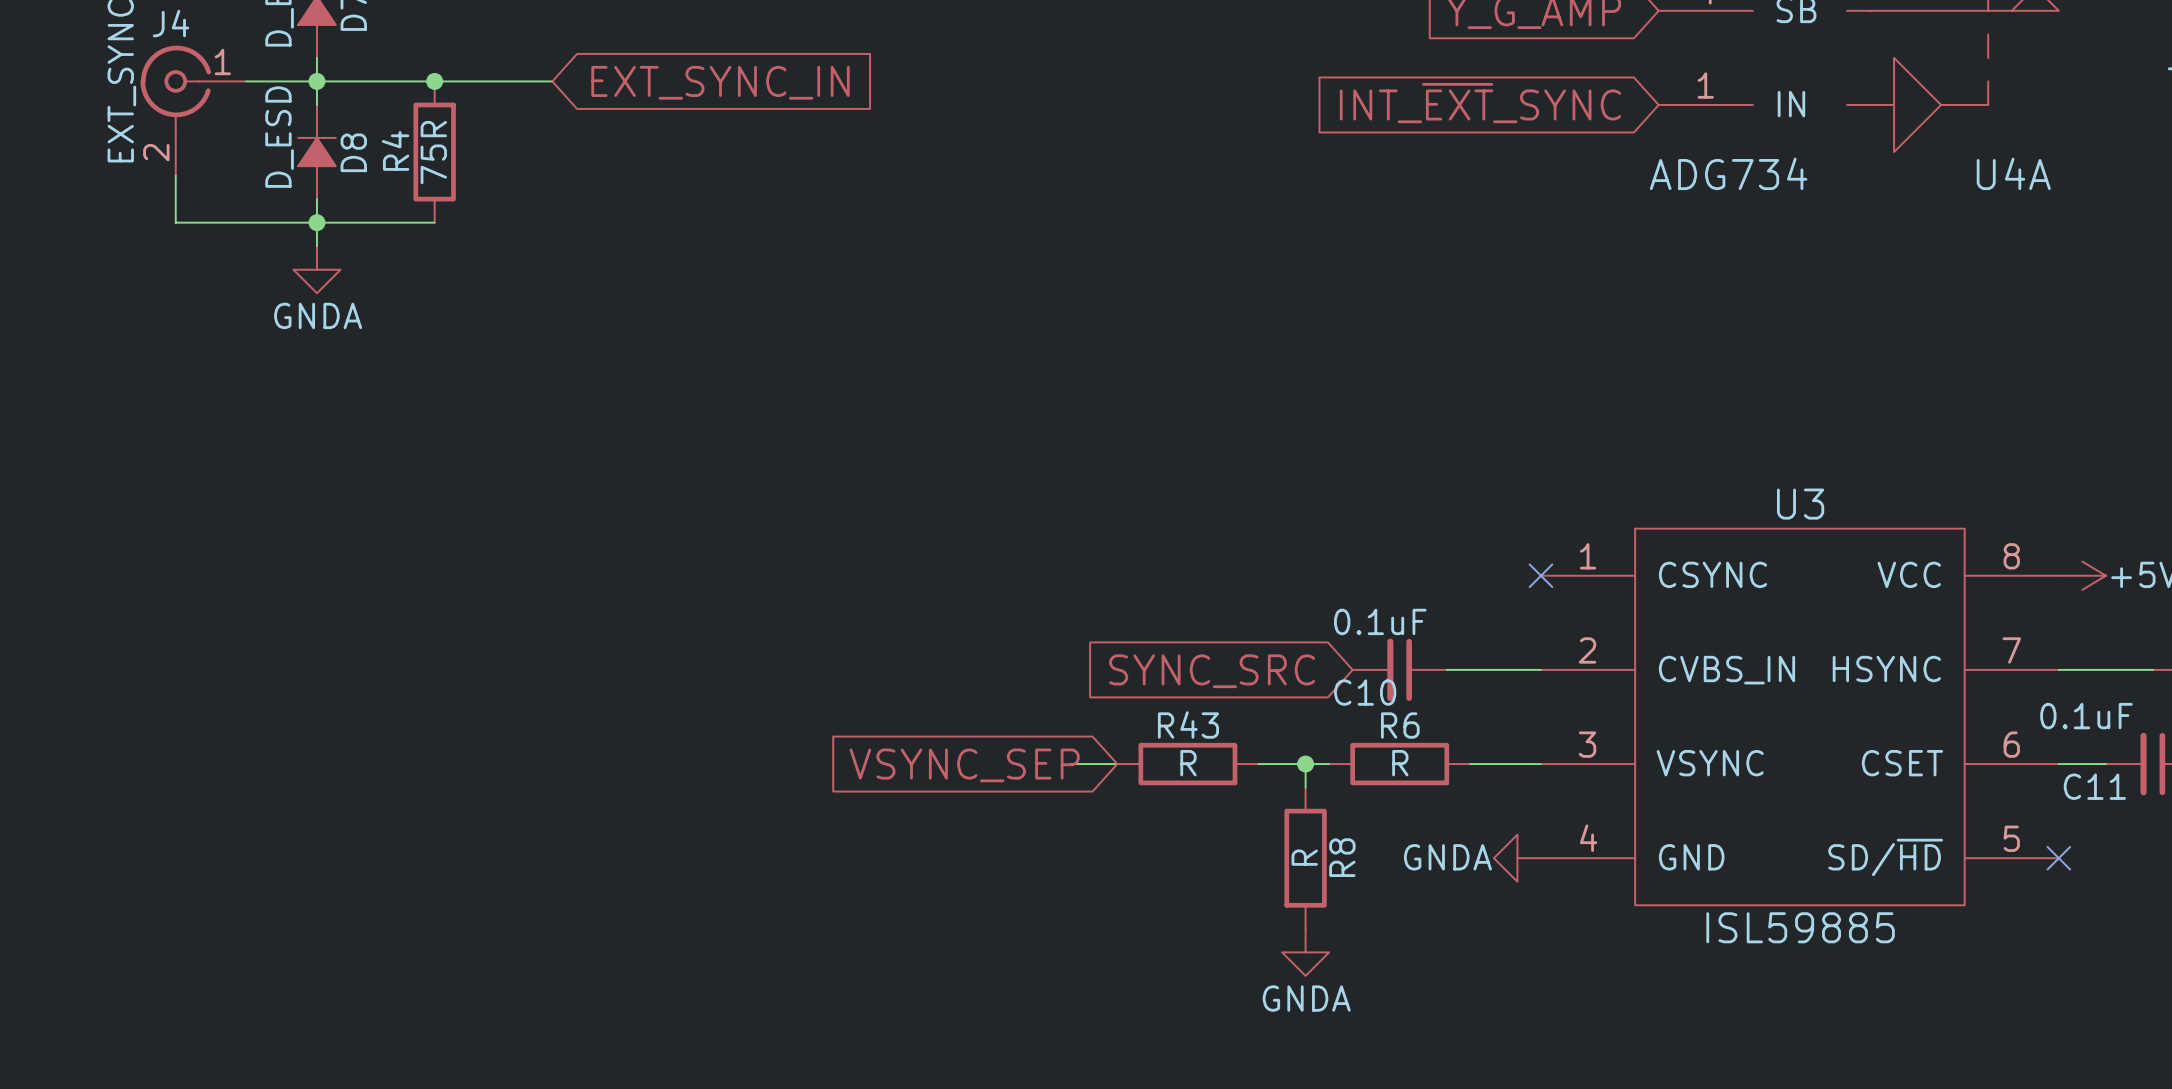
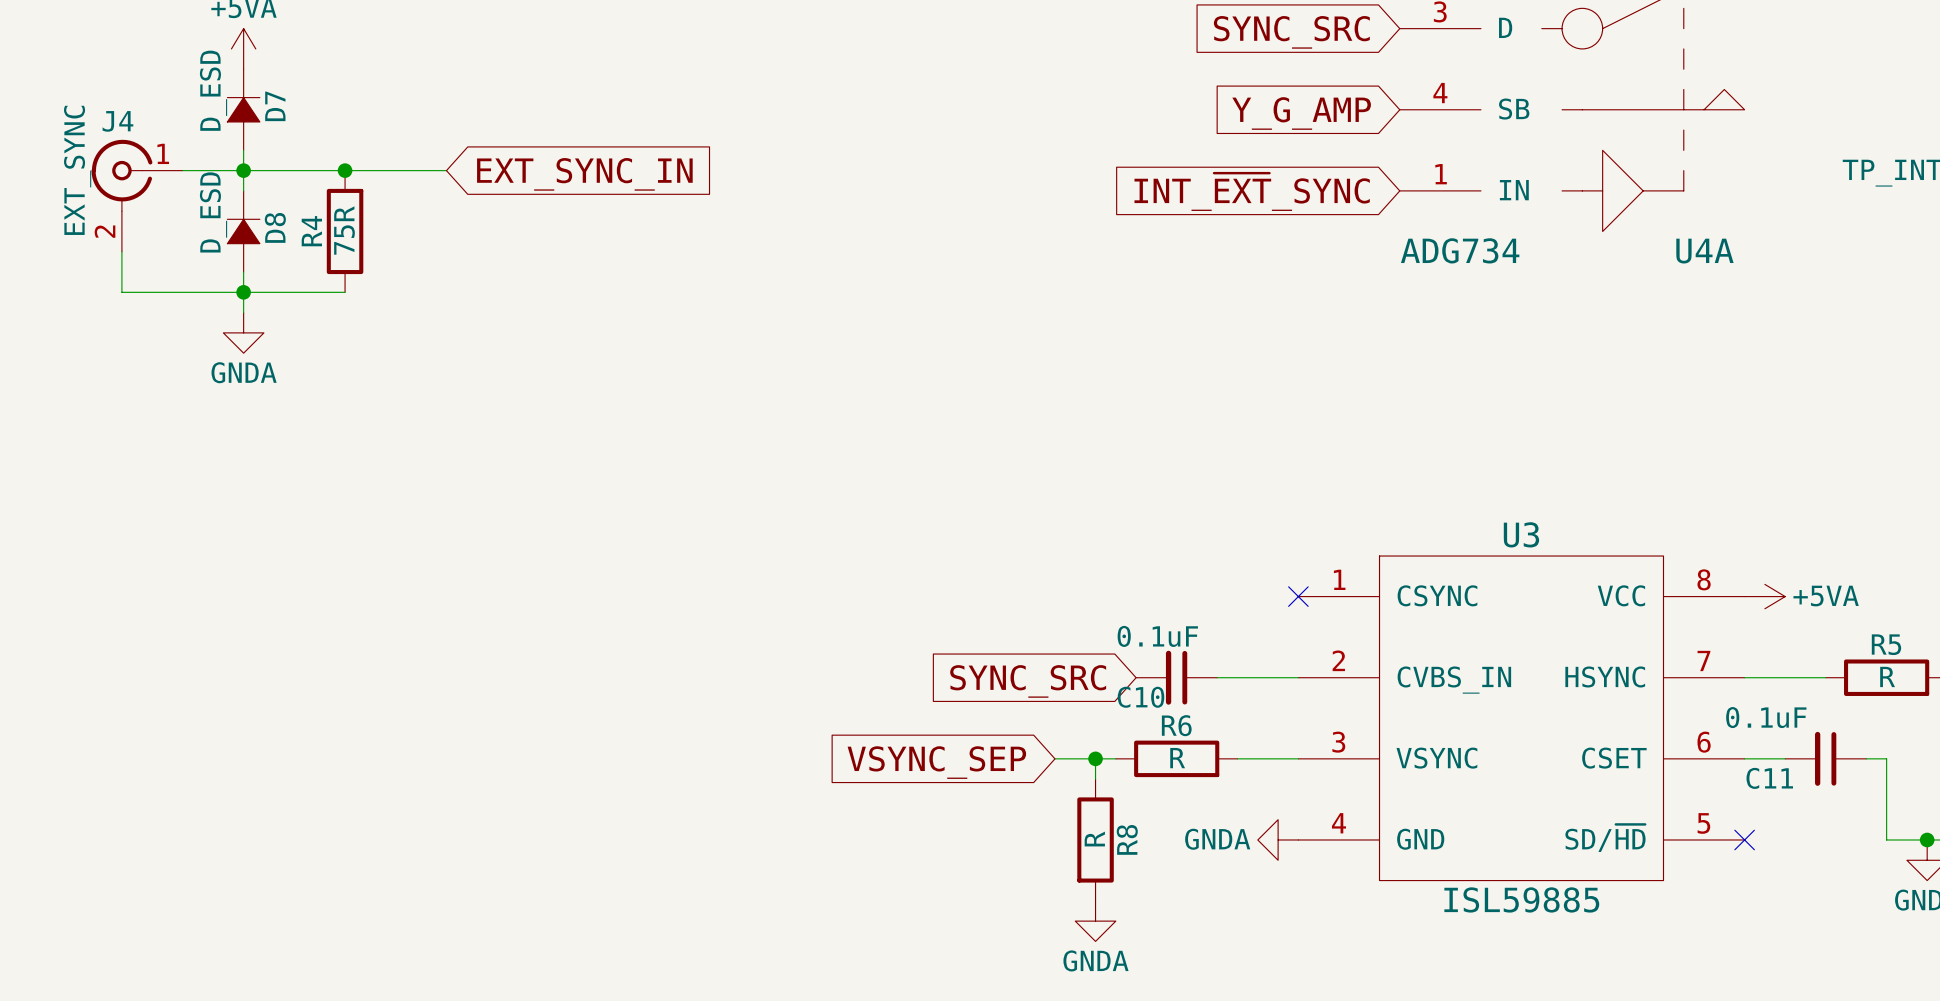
wire: (1070, 764) (1117, 764) -> none
R43: R (1187, 764) -> none
global label position: VSYNC_SEP (964, 765) -> VSYNC_SEP (936, 762)

